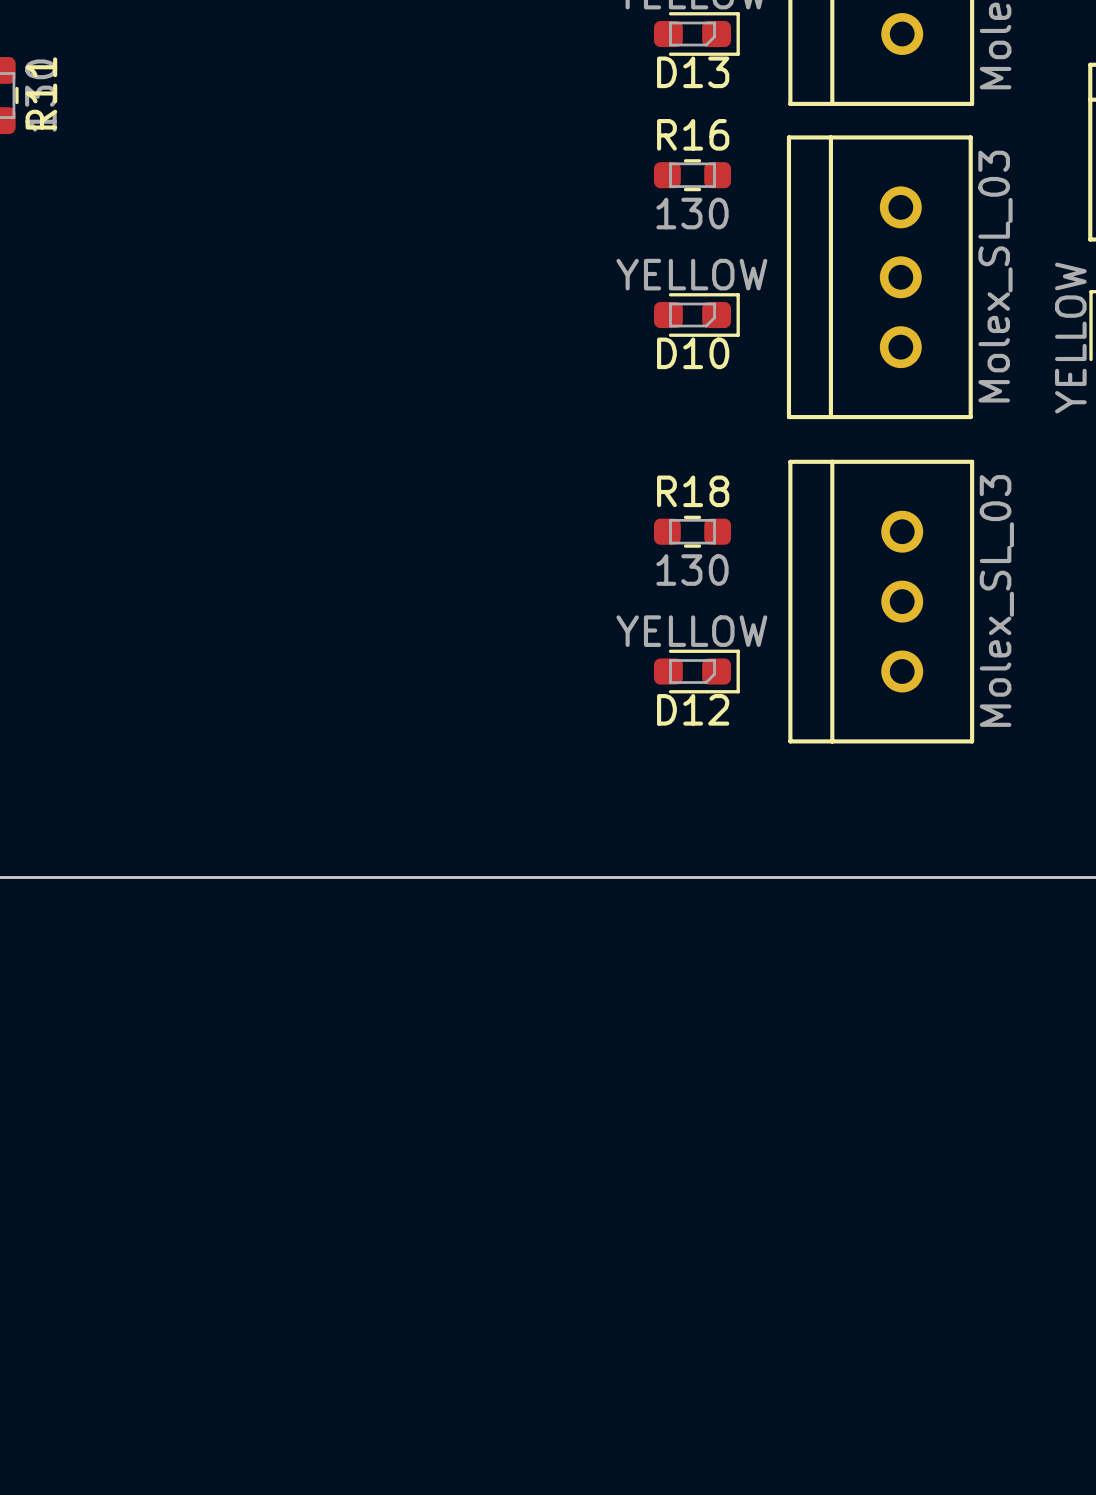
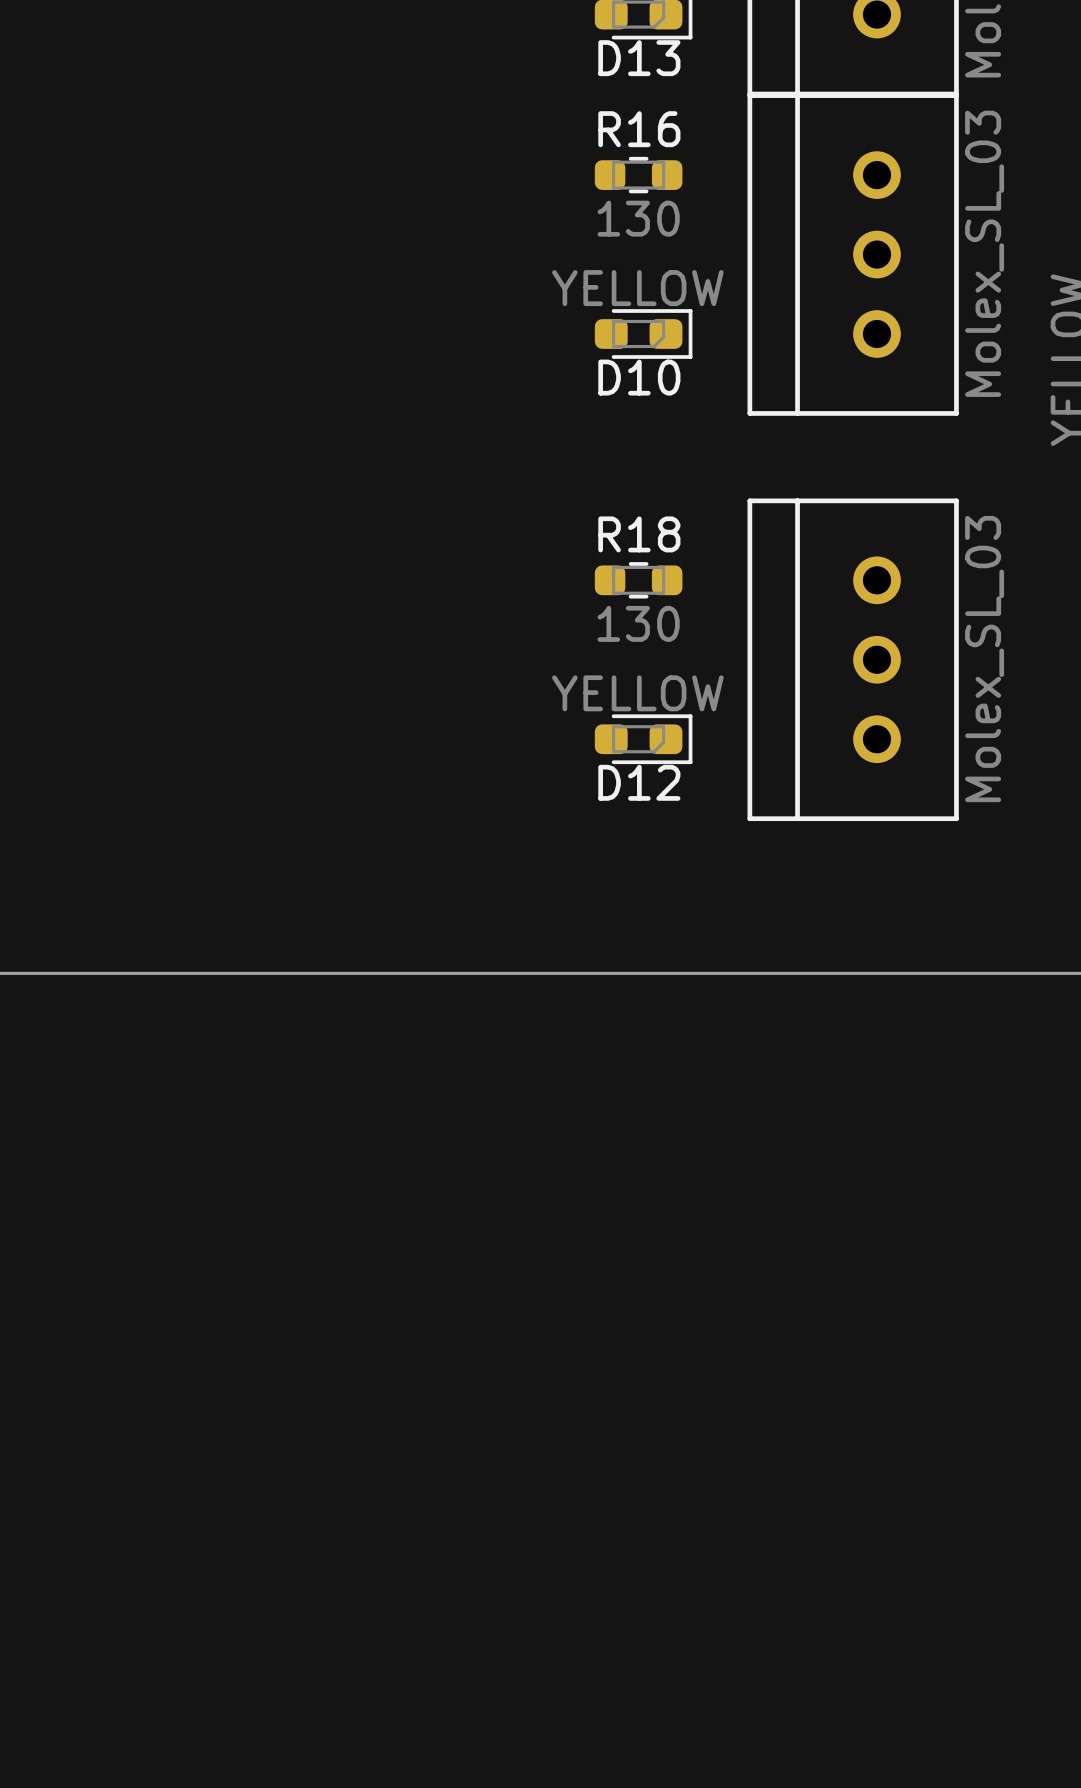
part position: (879, 277) -> (853, 254)

